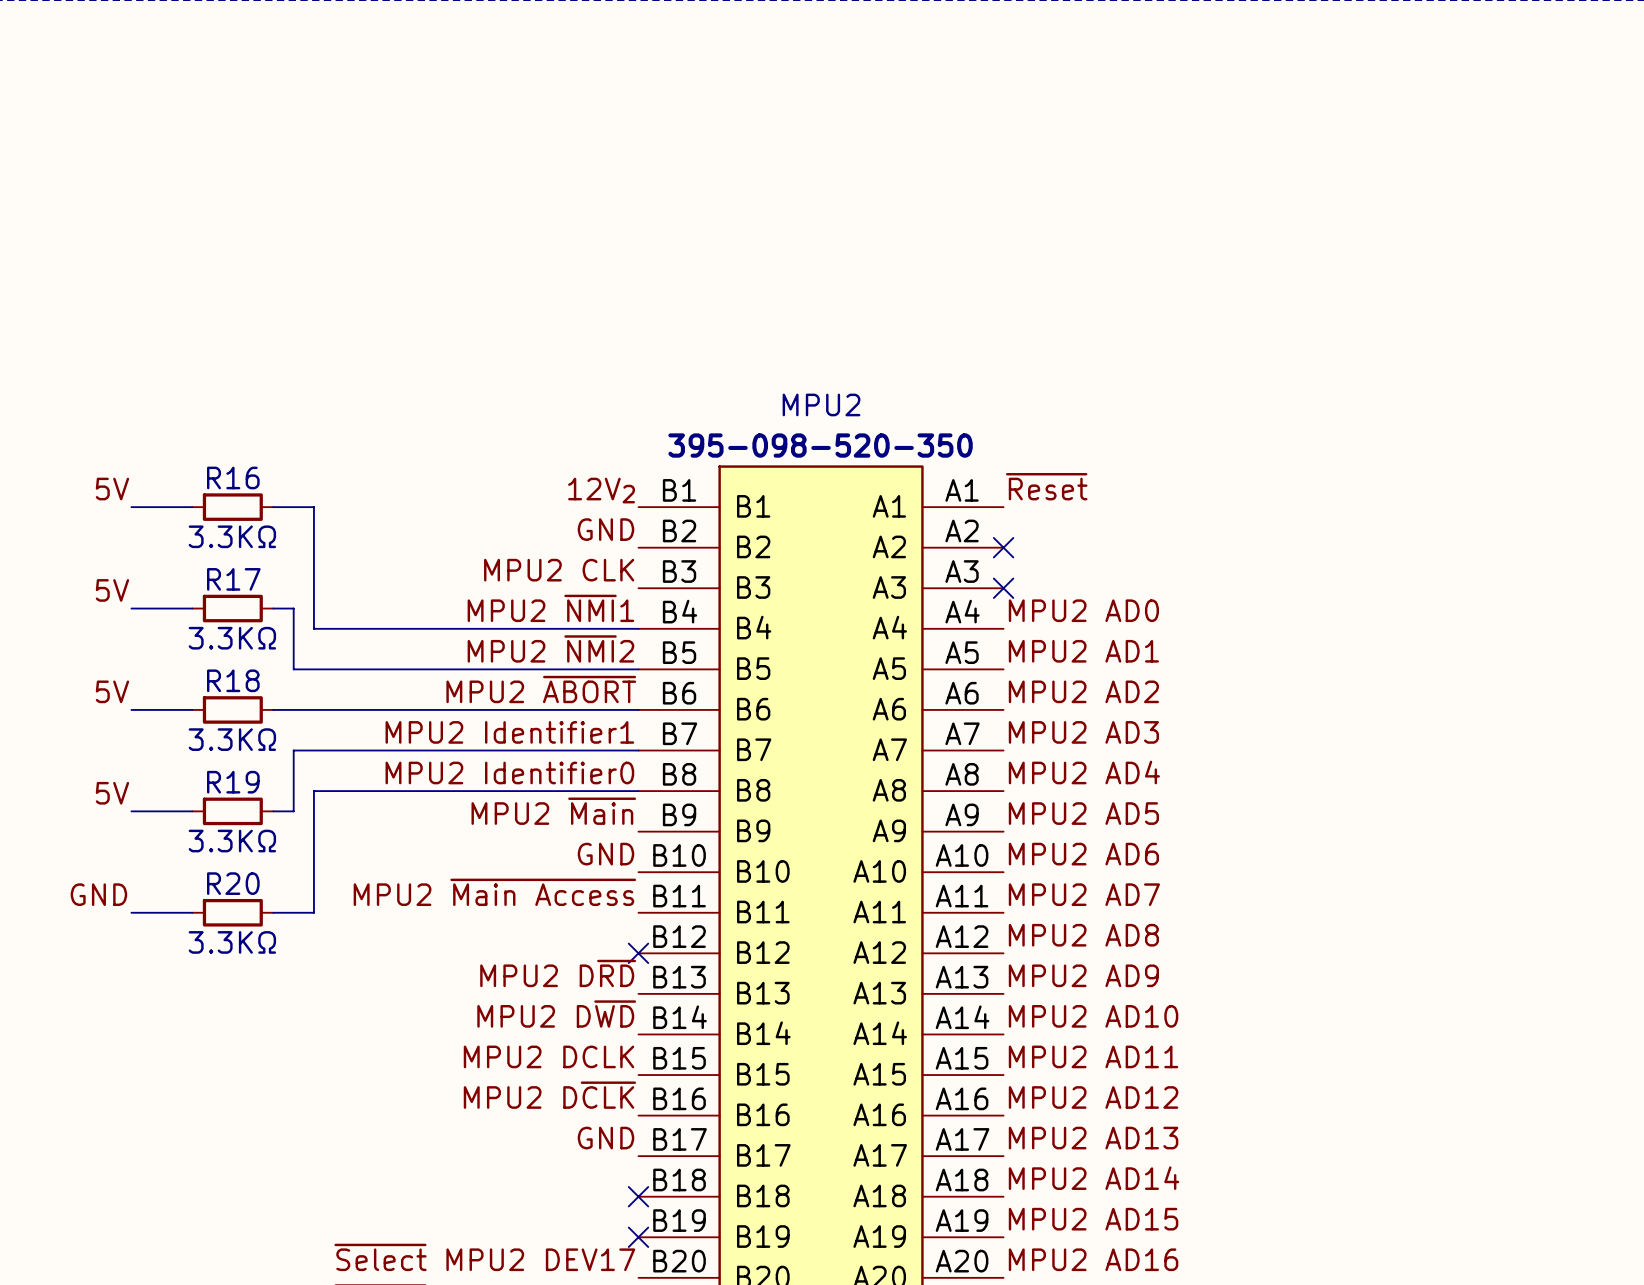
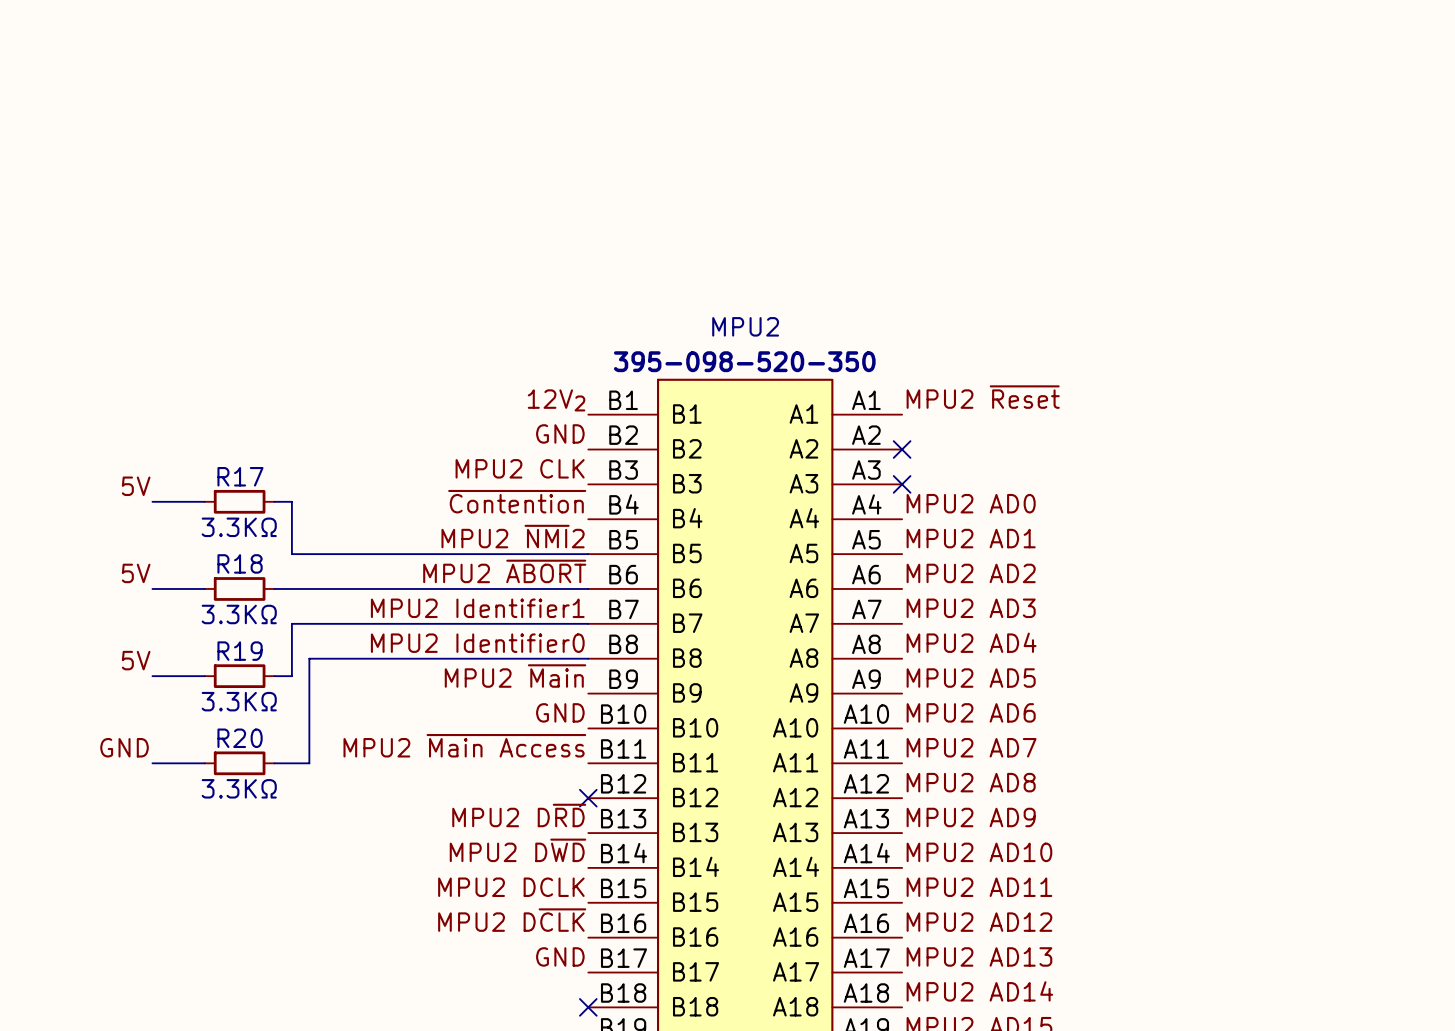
label: ~{Reset} (1046, 486) -> MPU2 ~{Reset} (983, 397)
label: 5V (112, 489) -> none
wire: (131, 507) (192, 507) -> none
R16: 3.3KΩ (232, 507) -> none
wire: (273, 507) (313, 507) (313, 628) (638, 628) -> none
label: MPU2 ~{NMI}1 (550, 608) -> ~{Contention} (517, 501)

